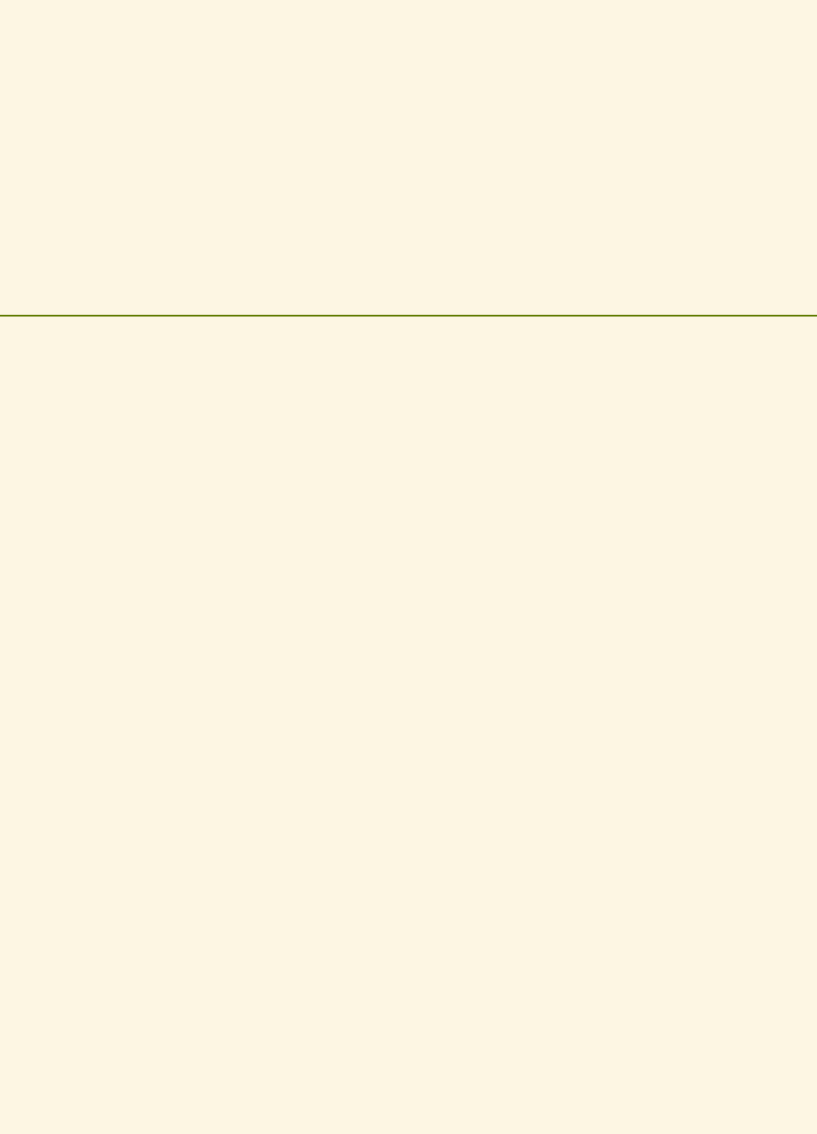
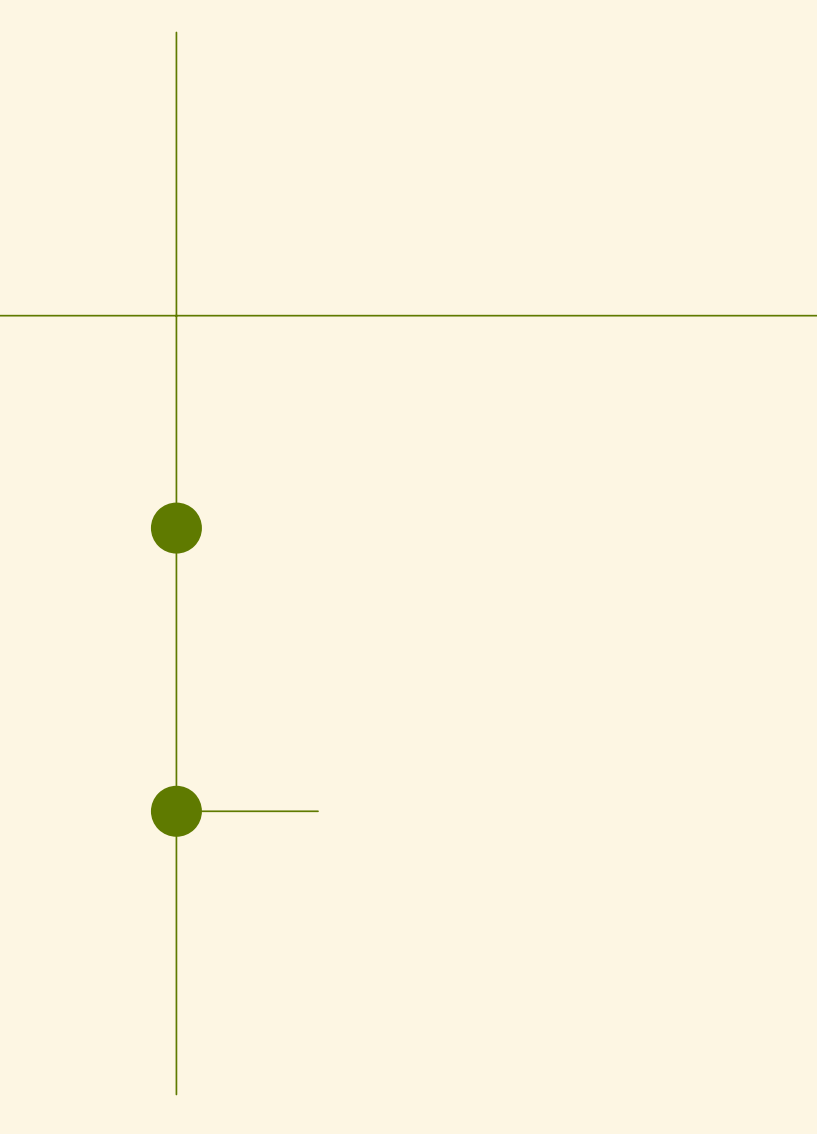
wire: none -> (176, 32) (176, 1094)
junction: none -> (176, 528)
wire: none -> (176, 811) (318, 811)
junction: none -> (176, 811)

